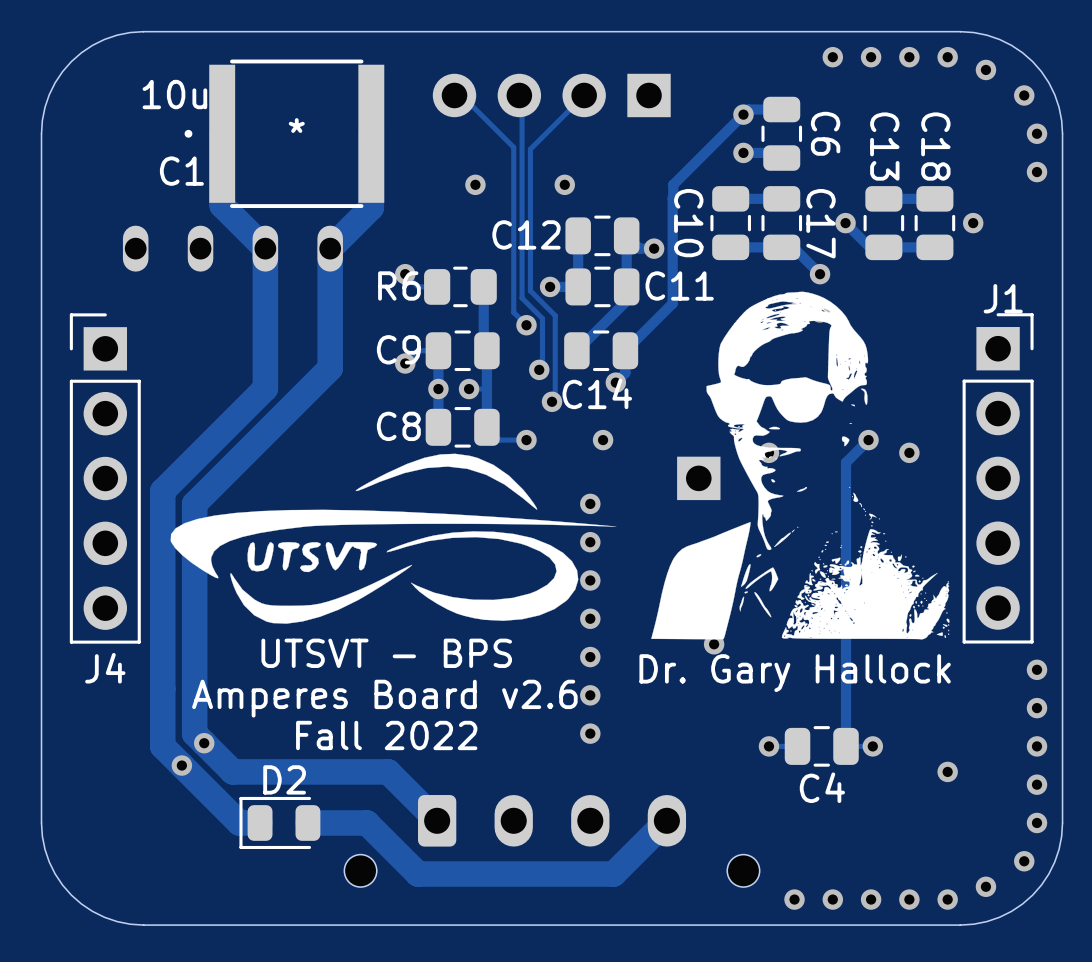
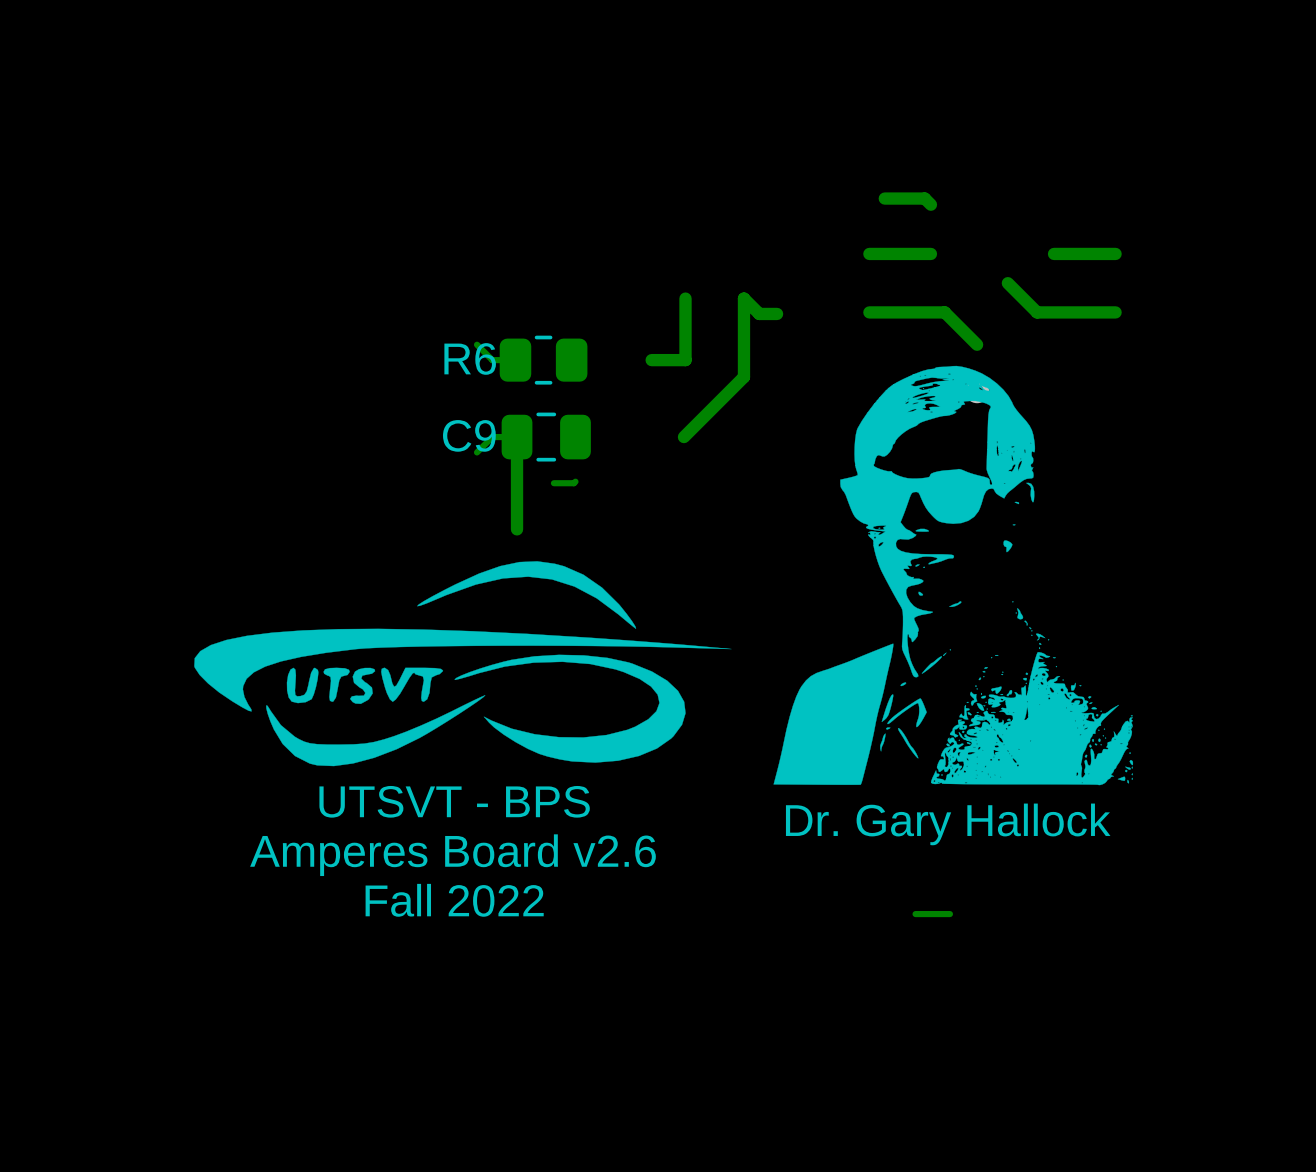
board edge: (960, 31) (143, 31) (117, 35) (104, 39) (81, 52) (71, 61) (62, 71) (49, 94) (44, 107) (41, 133) (41, 822) (44, 849) (49, 862) (62, 885) (71, 895) (81, 903) (104, 917) (117, 921) (143, 925) (960, 925) (973, 924) (999, 917) (1022, 903) (1032, 895) (1048, 874) (1054, 862) (1059, 849) (1062, 822) (1061, 120) (1059, 107) (1048, 82) (1032, 61) (1011, 45) (999, 39) (986, 35) (960, 31) -> none
via: (832, 57) -> none
via: (871, 57) -> none
via: (909, 57) -> none
via: (947, 57) -> none
via: (985, 69) -> none
track: (454, 95) (461, 95) (513, 147) (513, 312) (526, 325) -> none
track: (519, 95) (522, 98) (522, 298) (542, 318) (542, 366) (539, 369) -> none
part: (551, 95) -> none
track: (584, 95) (530, 149) (530, 290) (555, 315) (555, 398) (552, 401) -> none
via: (1024, 95) -> none
track: (781, 109) (748, 109) (673, 184) (672, 303) (625, 350) (625, 373) (615, 382) -> none
via: (743, 114) -> none
track: (222, 133) (222, 205) (265, 248) (265, 388) (162, 491) (162, 746) (239, 822) (260, 822) -> none
C1: 10u (284, 133) -> none
track: (371, 133) (371, 207) (330, 248) (330, 368) (194, 503) (194, 733) (232, 771) (388, 771) (437, 820) -> none
C6: (781, 133) -> none
via: (1037, 133) -> none
via: (743, 152) -> none
via: (1037, 172) -> none
via: (475, 184) -> none
via: (564, 184) -> none
C10: (730, 223) -> none
C17: (781, 223) -> none
via: (845, 223) -> none
C13: (883, 223) -> none
C18: (934, 223) -> none
via: (973, 223) -> none
C12: (602, 235) -> none
part: (232, 248) -> none
via: (654, 248) -> none
via: (405, 274) -> none
via: (820, 274) -> none
track: (483, 286) (483, 347) (486, 350) (486, 427) (499, 440) (526, 440) -> none
via: (550, 286) -> none
C11: (602, 286) -> none
via: (526, 325) -> none
C14: (601, 350) -> none
via: (405, 363) -> none
via: (539, 369) -> none
via: (615, 382) -> none
via: (438, 389) -> none
via: (469, 389) -> none
via: (552, 401) -> none
C8: (462, 427) -> none
via: (526, 440) -> none
via: (603, 440) -> none
track: (868, 440) (846, 462) (846, 746) (872, 746) -> none
via: (868, 440) -> none
via: (768, 452) -> none
via: (909, 452) -> none
J4: (105, 478) -> none
part: (698, 478) -> none
J1: (998, 478) -> none
via: (590, 503) -> none
via: (590, 542) -> none
via: (590, 580) -> none
via: (590, 618) -> none
via: (714, 644) -> none
via: (590, 657) -> none
via: (1037, 669) -> none
via: (590, 695) -> none
via: (1037, 708) -> none
via: (590, 733) -> none
via: (204, 743) -> none
via: (768, 746) -> none
C4: (821, 746) -> none
via: (872, 746) -> none
via: (1037, 746) -> none
via: (181, 765) -> none
via: (947, 771) -> none
via: (1037, 784) -> none
track: (666, 820) (613, 874) (418, 874) (366, 822) (307, 822) -> none
D2: (279, 822) -> none
via: (1037, 822) -> none
part: (552, 841) -> none
via: (1024, 861) -> none
via: (985, 886) -> none
via: (794, 899) -> none
via: (832, 899) -> none
via: (871, 899) -> none
via: (909, 899) -> none
via: (947, 899) -> none

